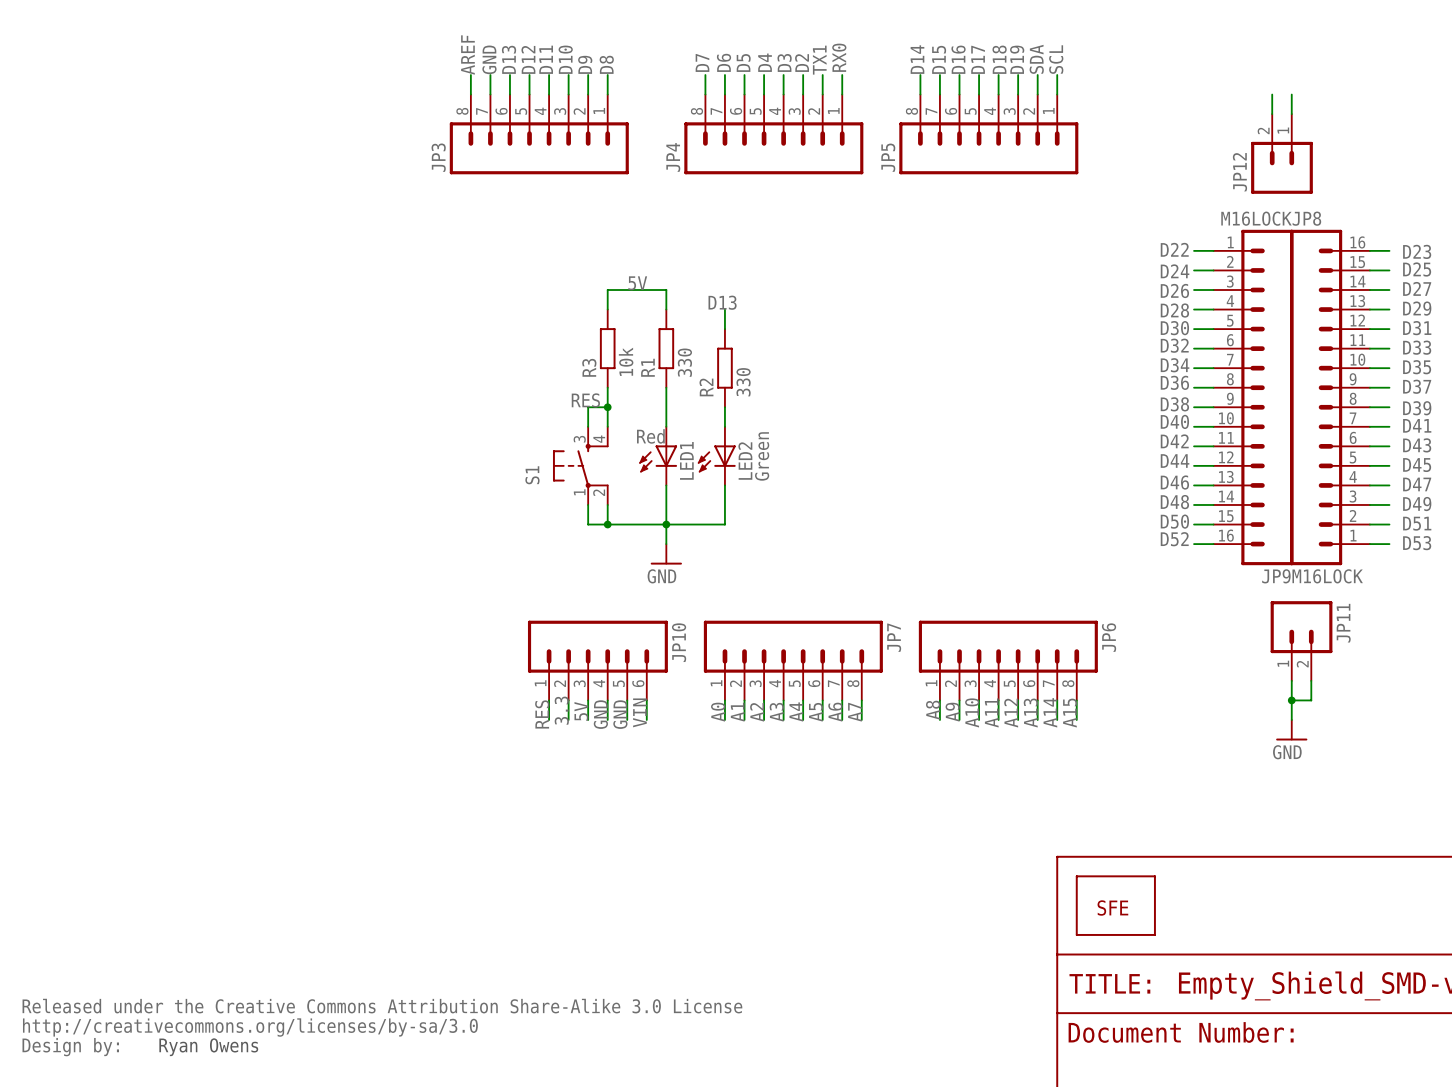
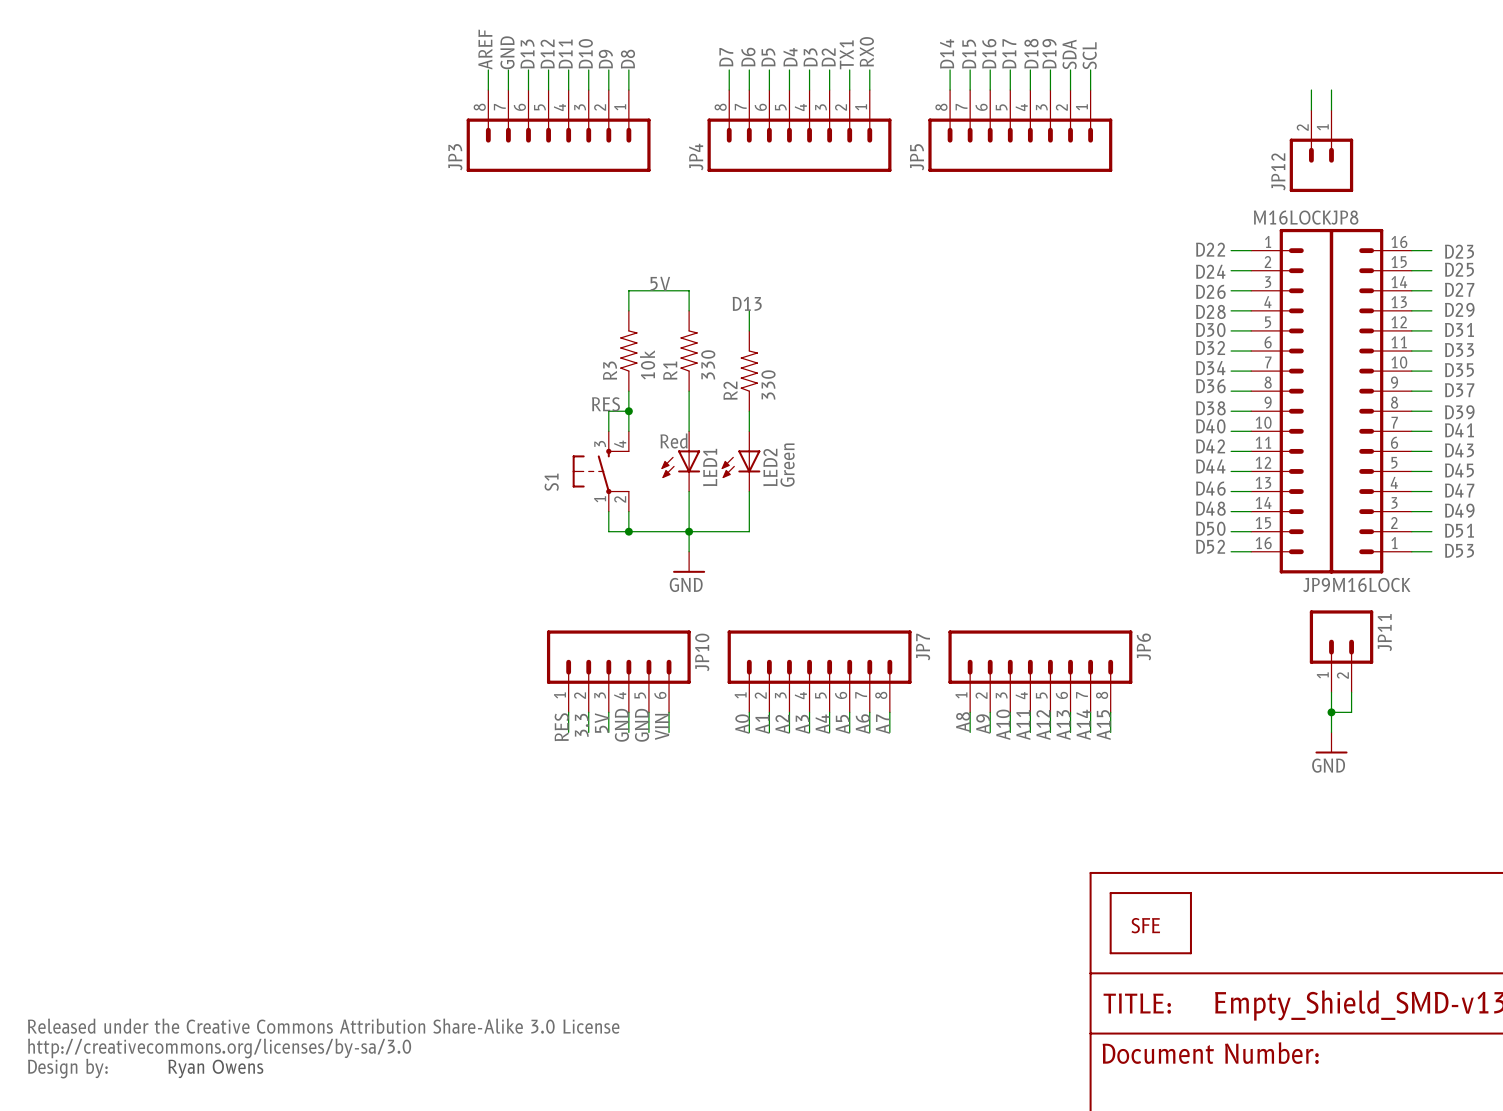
R3 symbol: [599, 309, 616, 388] -> [620, 310, 638, 392]
R1 symbol: [658, 309, 675, 388] -> [680, 310, 698, 392]
R2 symbol: [717, 329, 733, 408] -> [740, 330, 758, 412]

